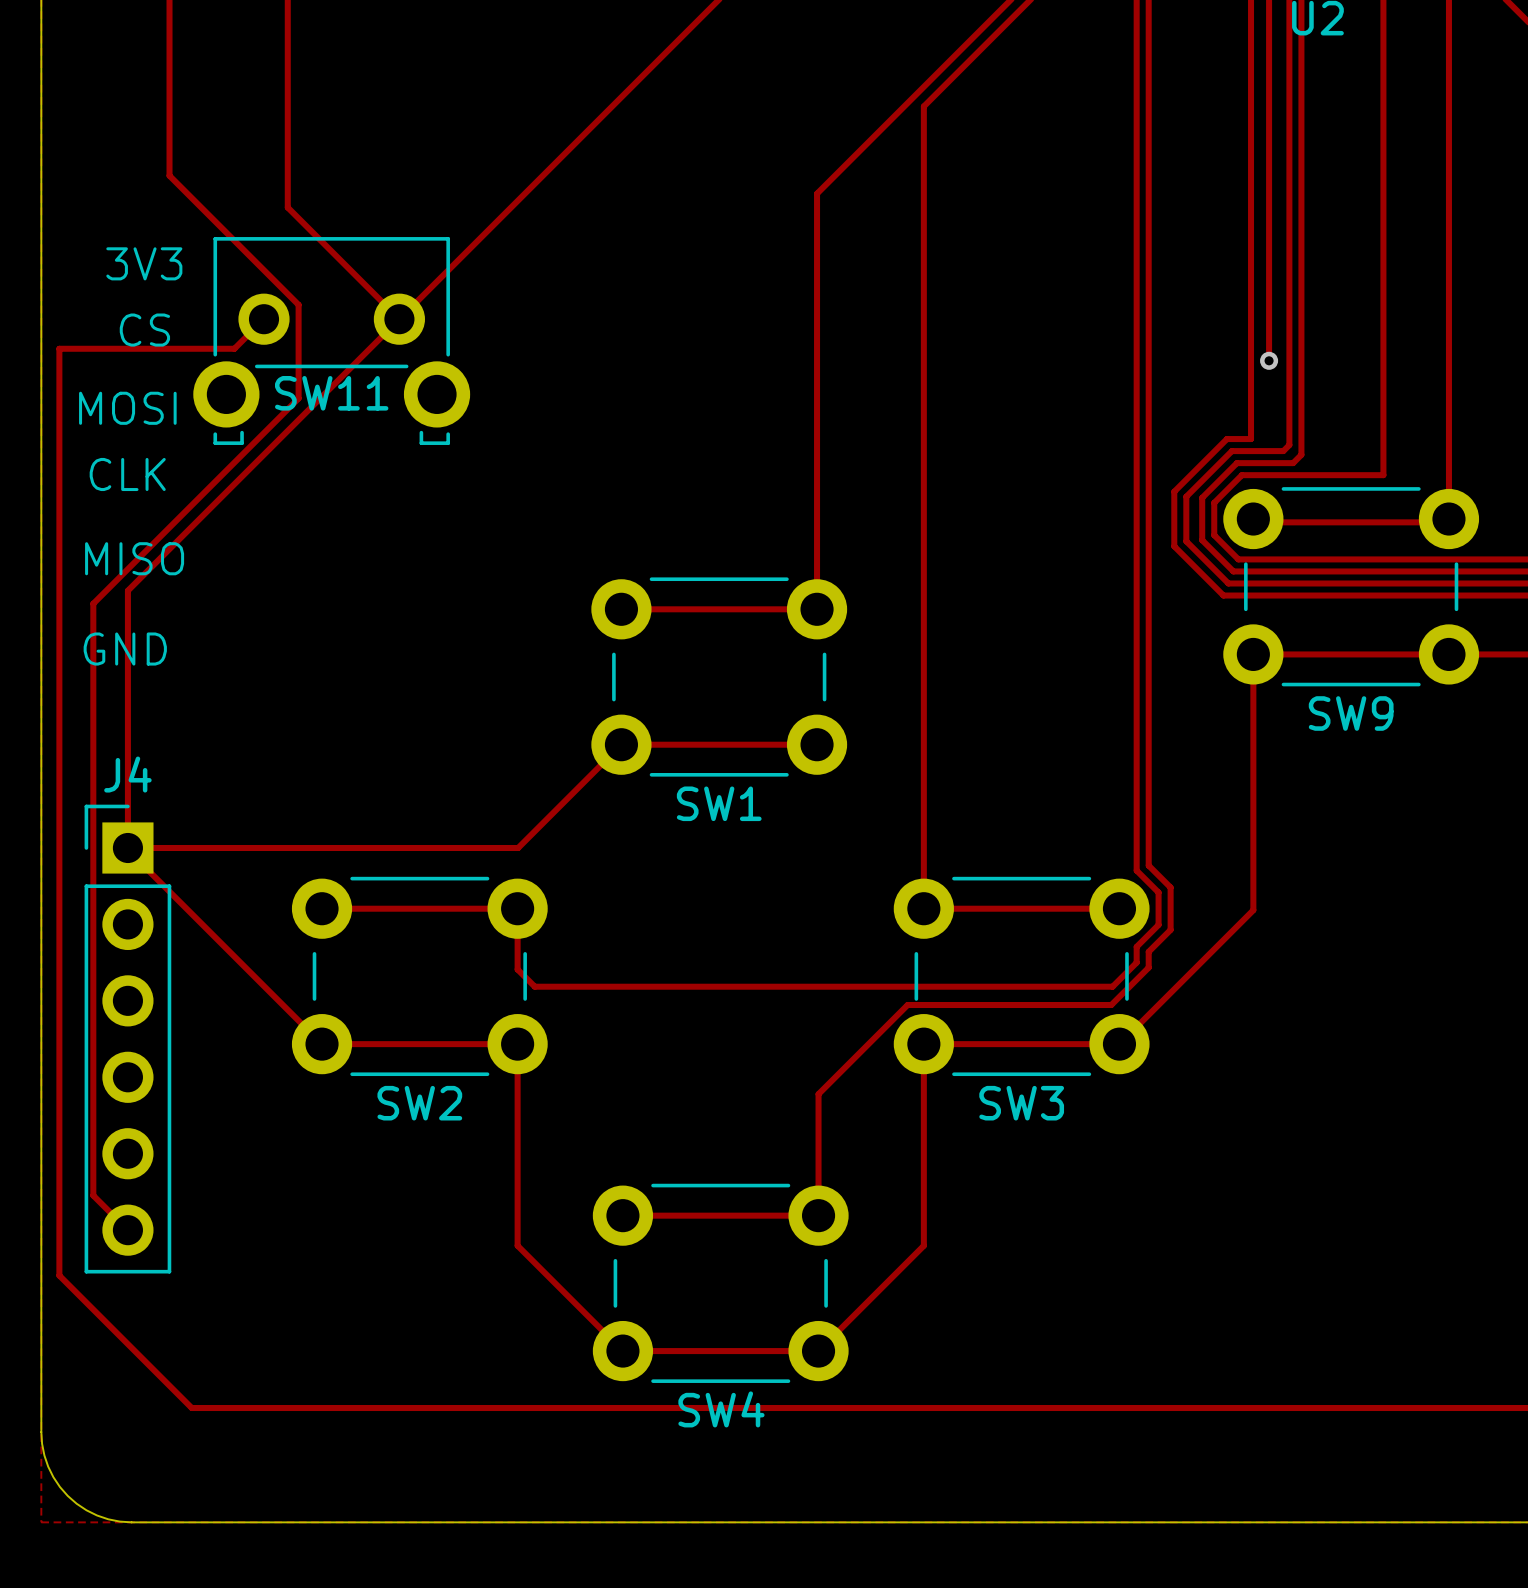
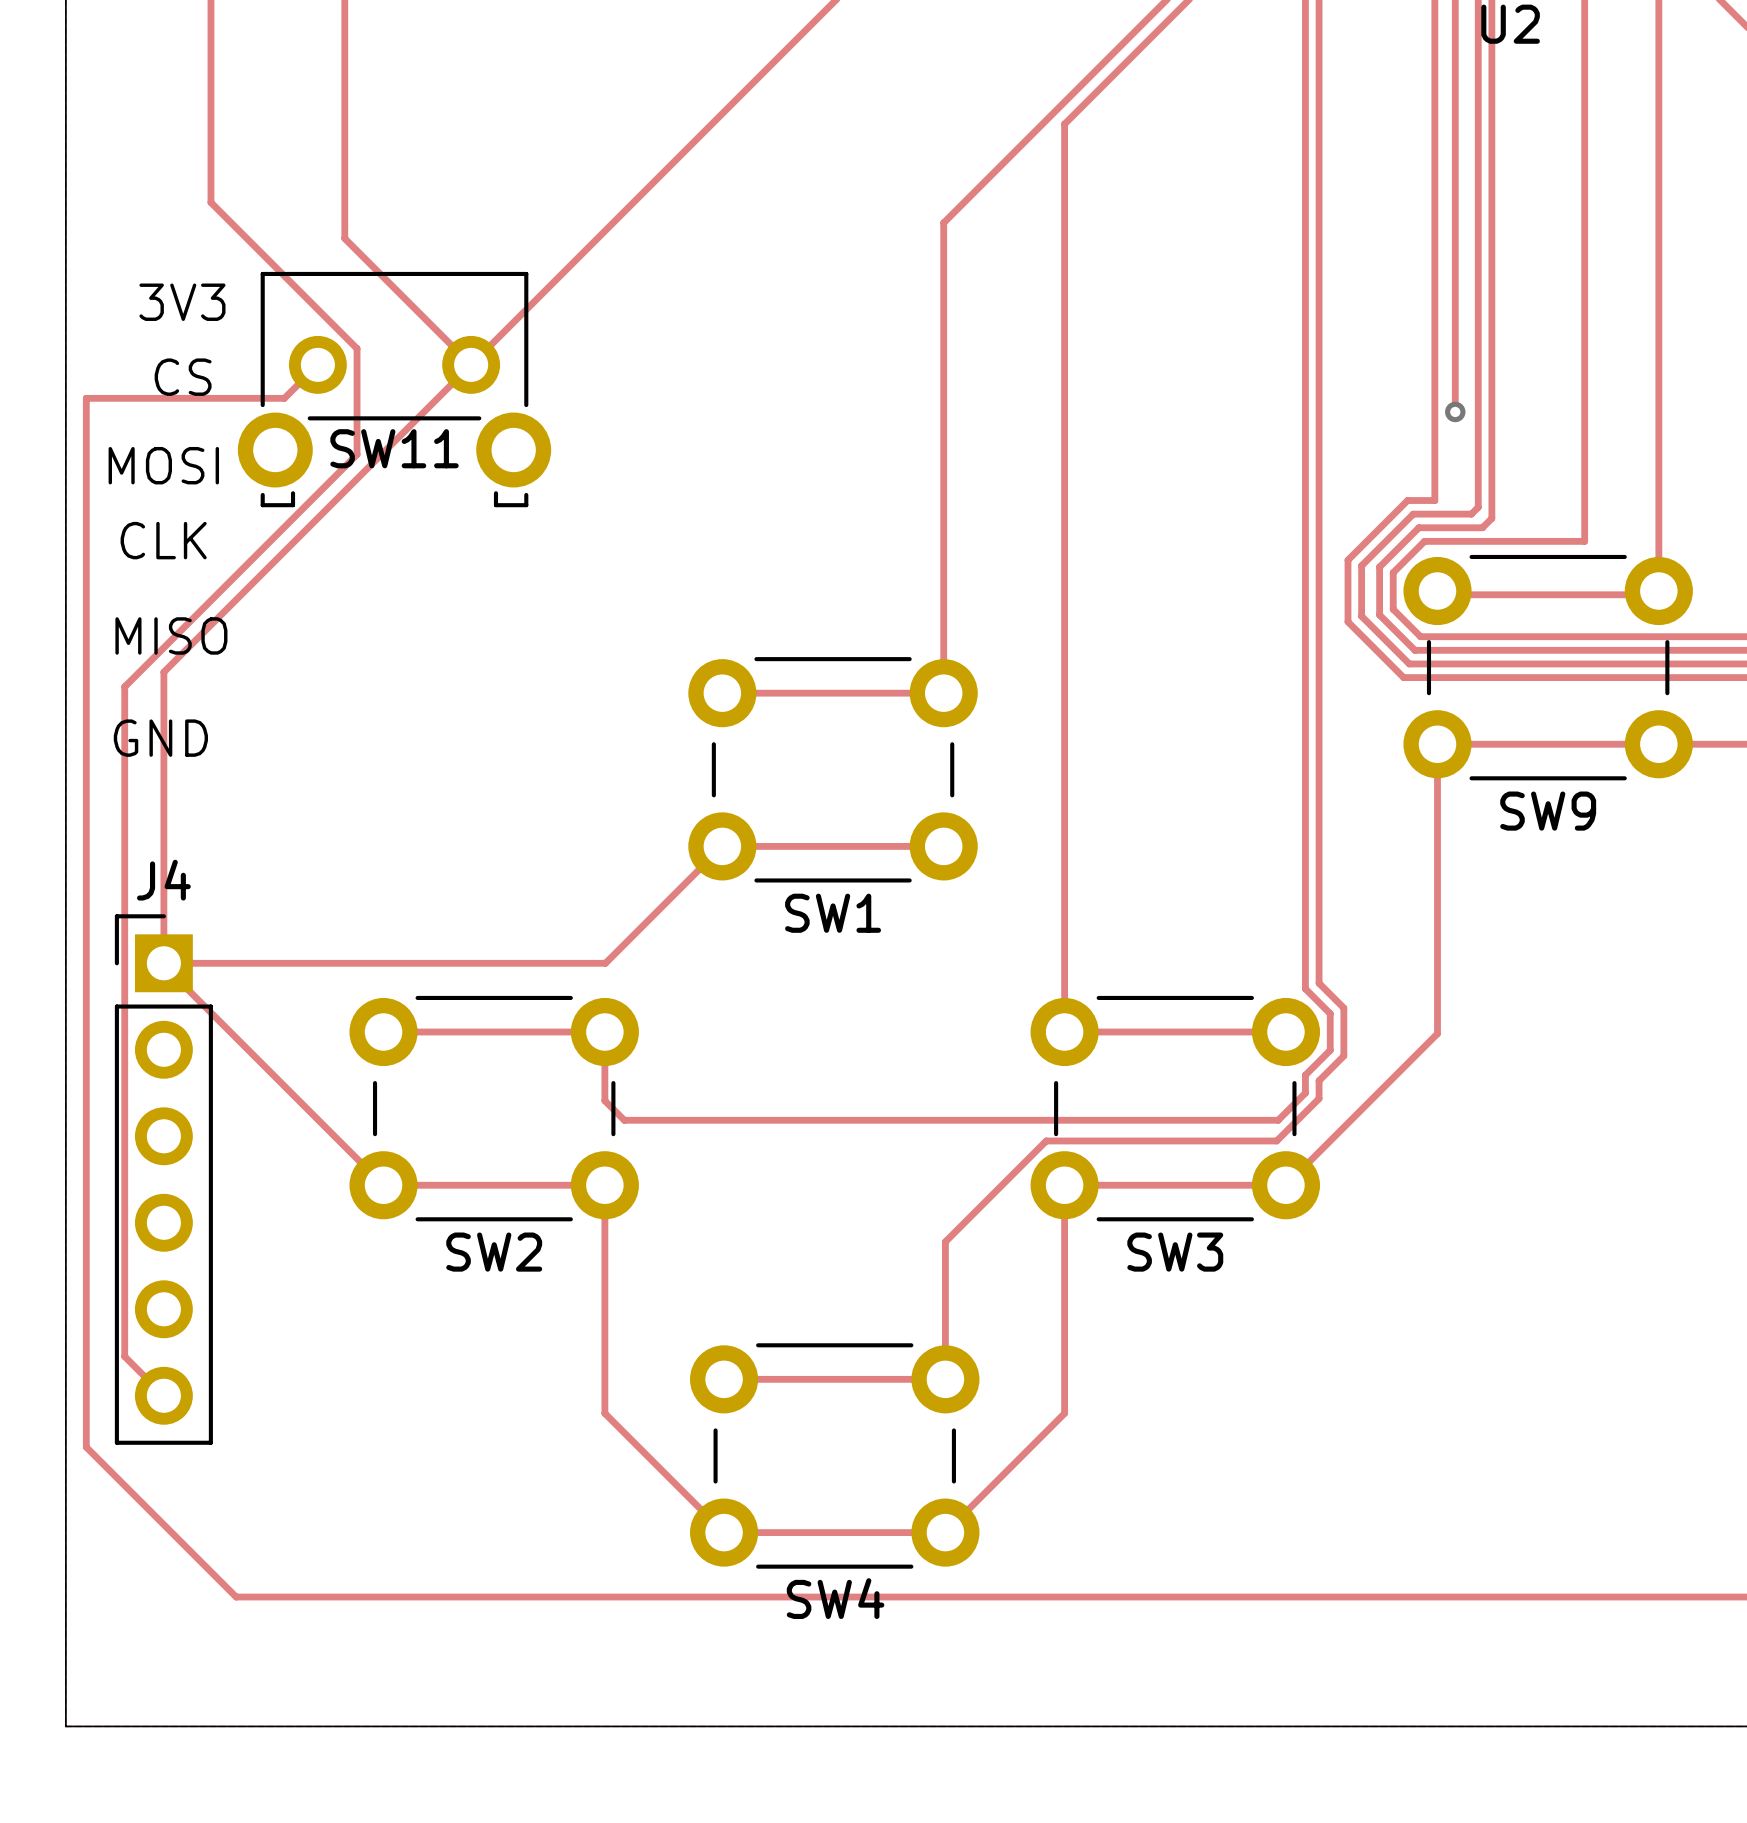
board edge: (41, 1432) (44, 1455) (48, 1466) (53, 1477) (67, 1495) (86, 1510) (97, 1515) (108, 1519) (131, 1522) -> (65, 1624) (65, 1726) (168, 1726)

